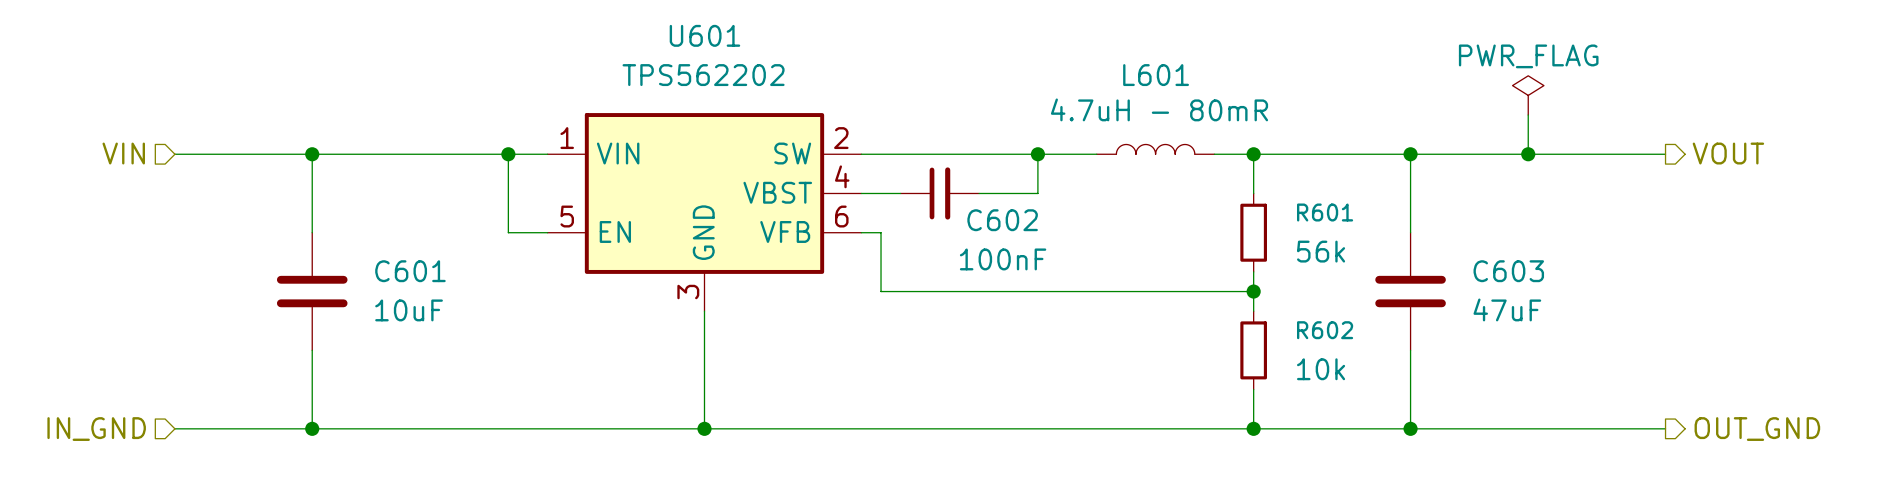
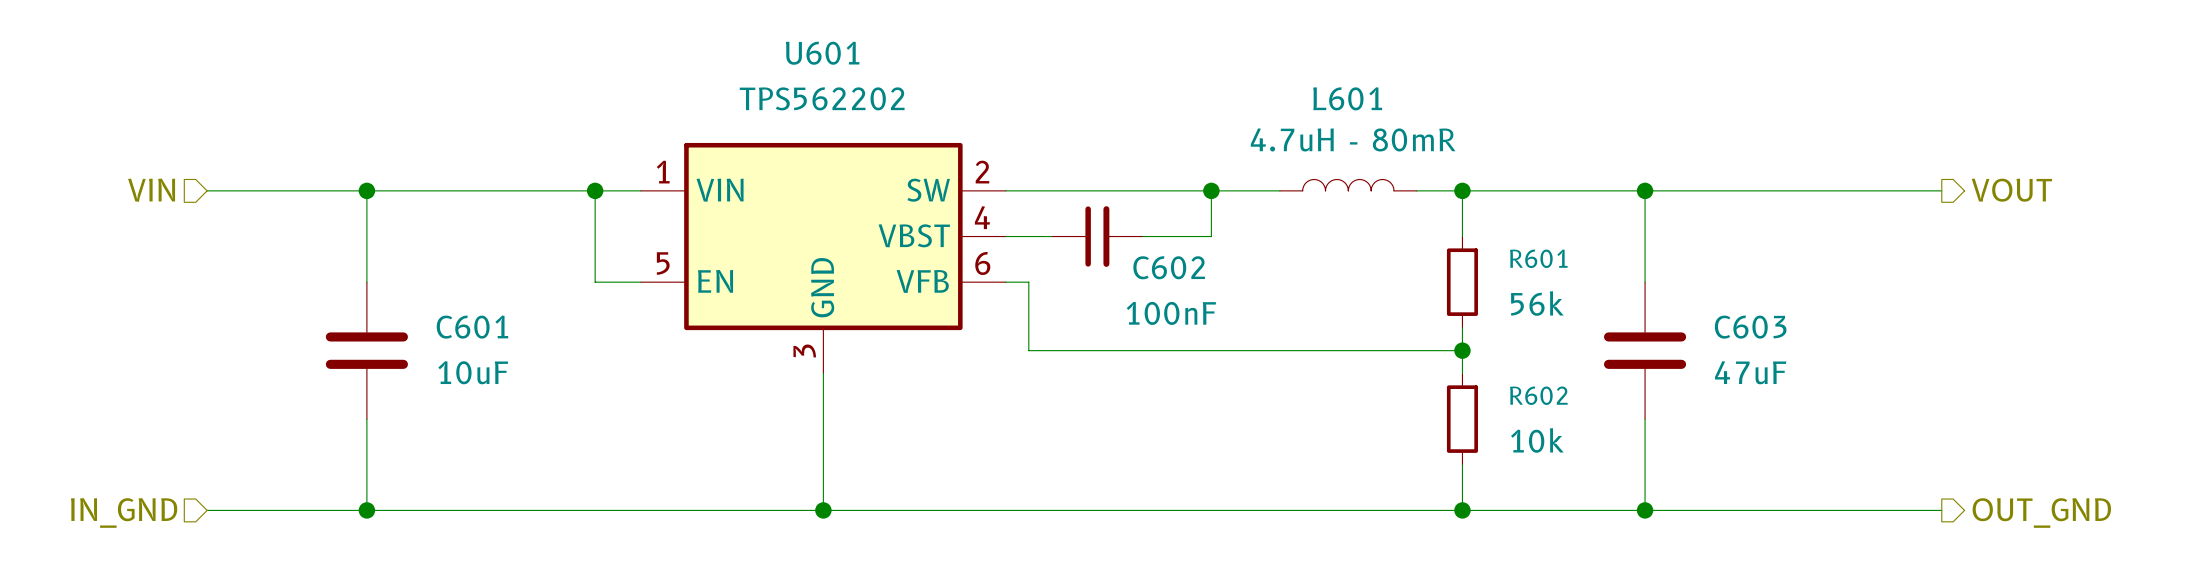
power symbol: PWR_FLAG (1528, 95) -> none
wire: (1528, 115) (1528, 154) -> none
junction: (1528, 154) -> none

